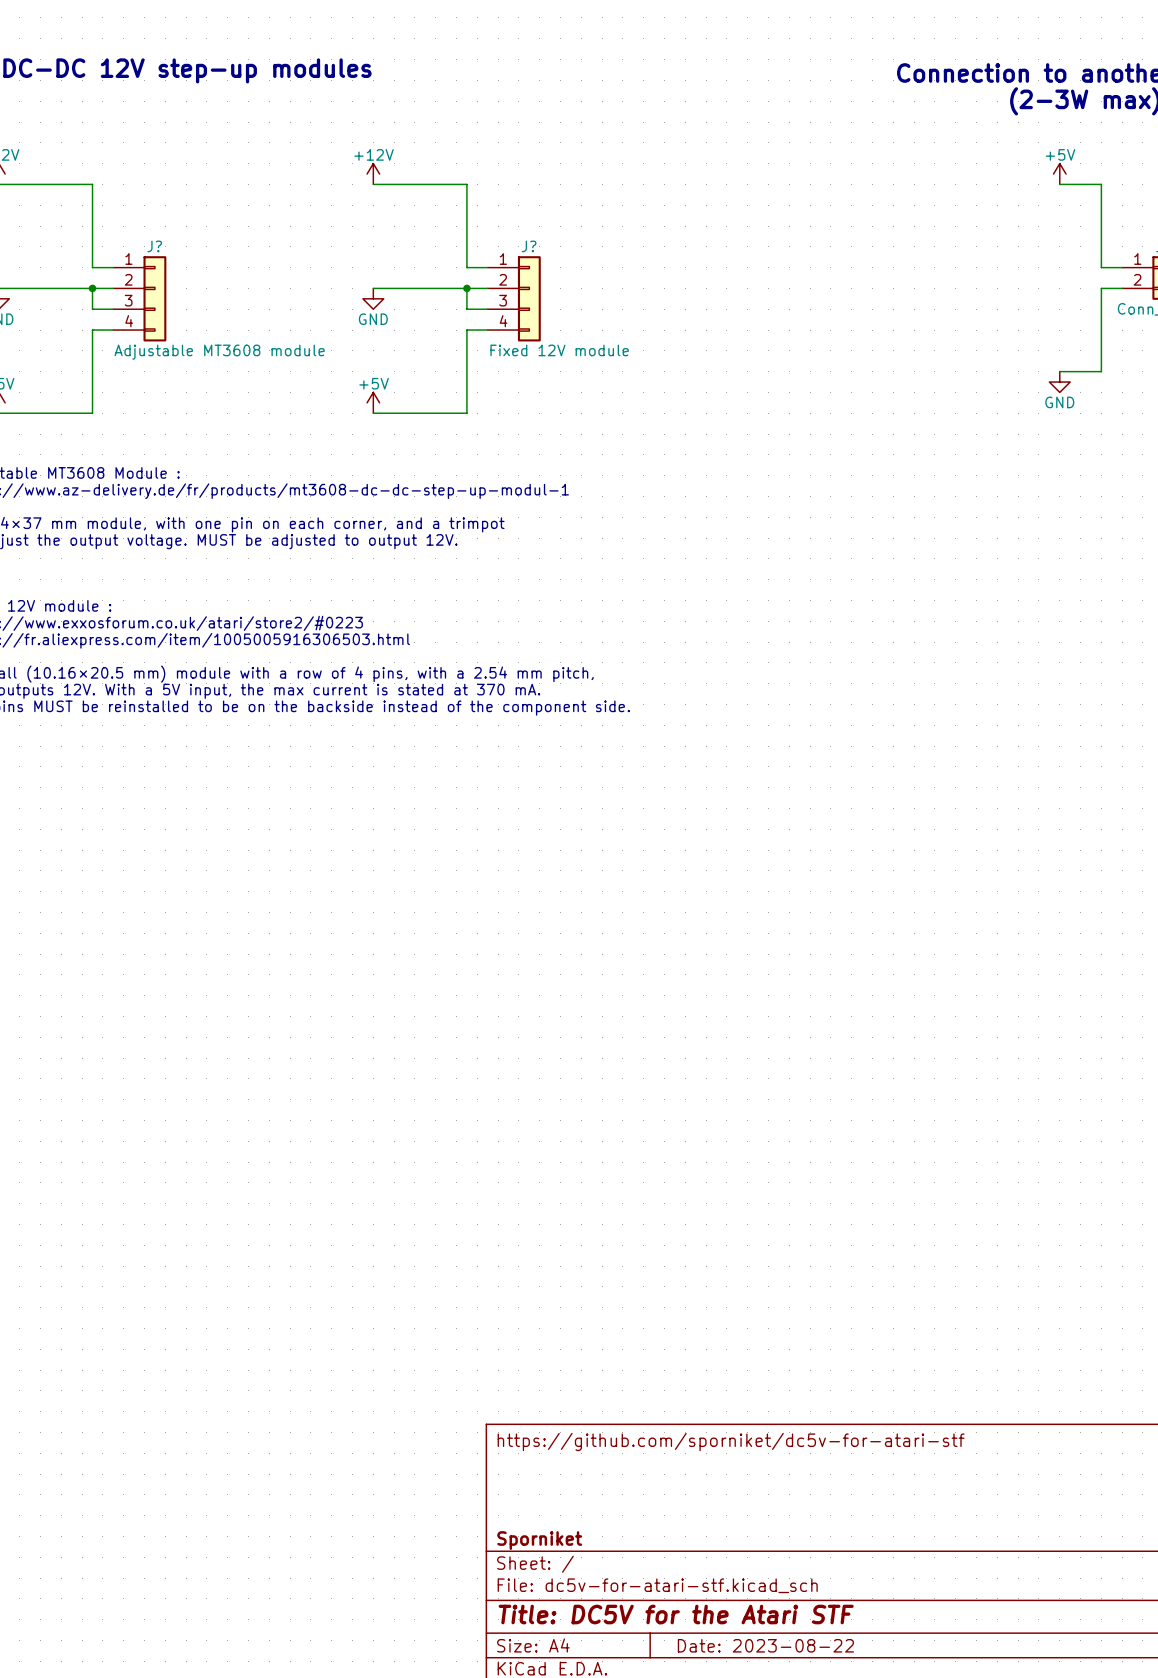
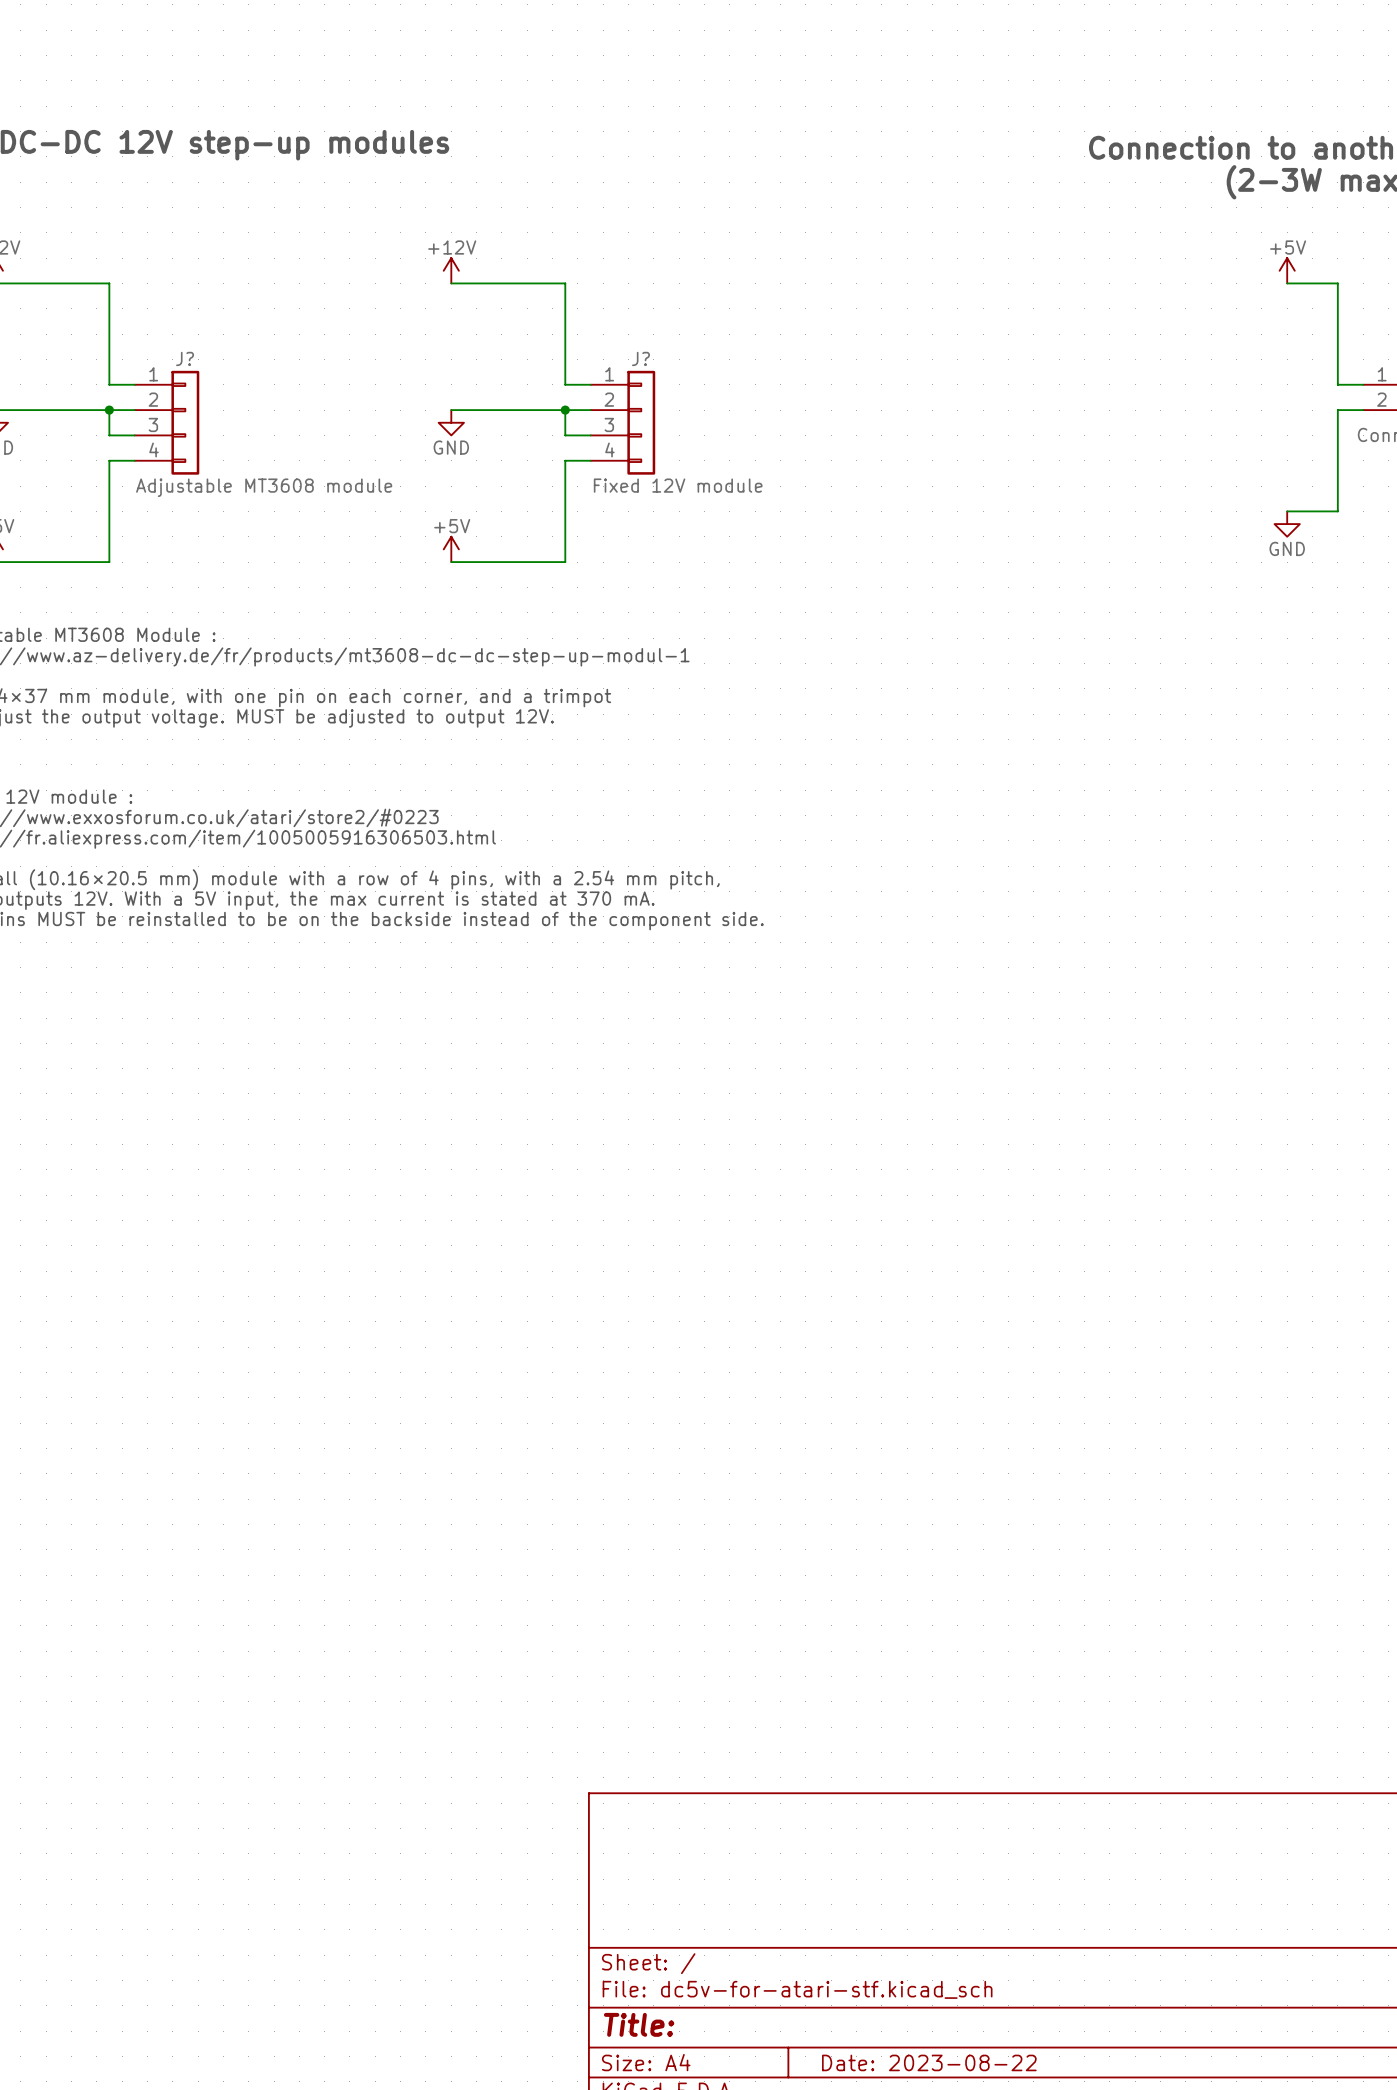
title block: https://github.com/sporniket/dc5v-for-atari-stf (731, 1441) -> none
title block: Sporniket (539, 1540) -> none
title block: Title: DC5V for the Atari STF (676, 1614) -> Title: (639, 2024)

